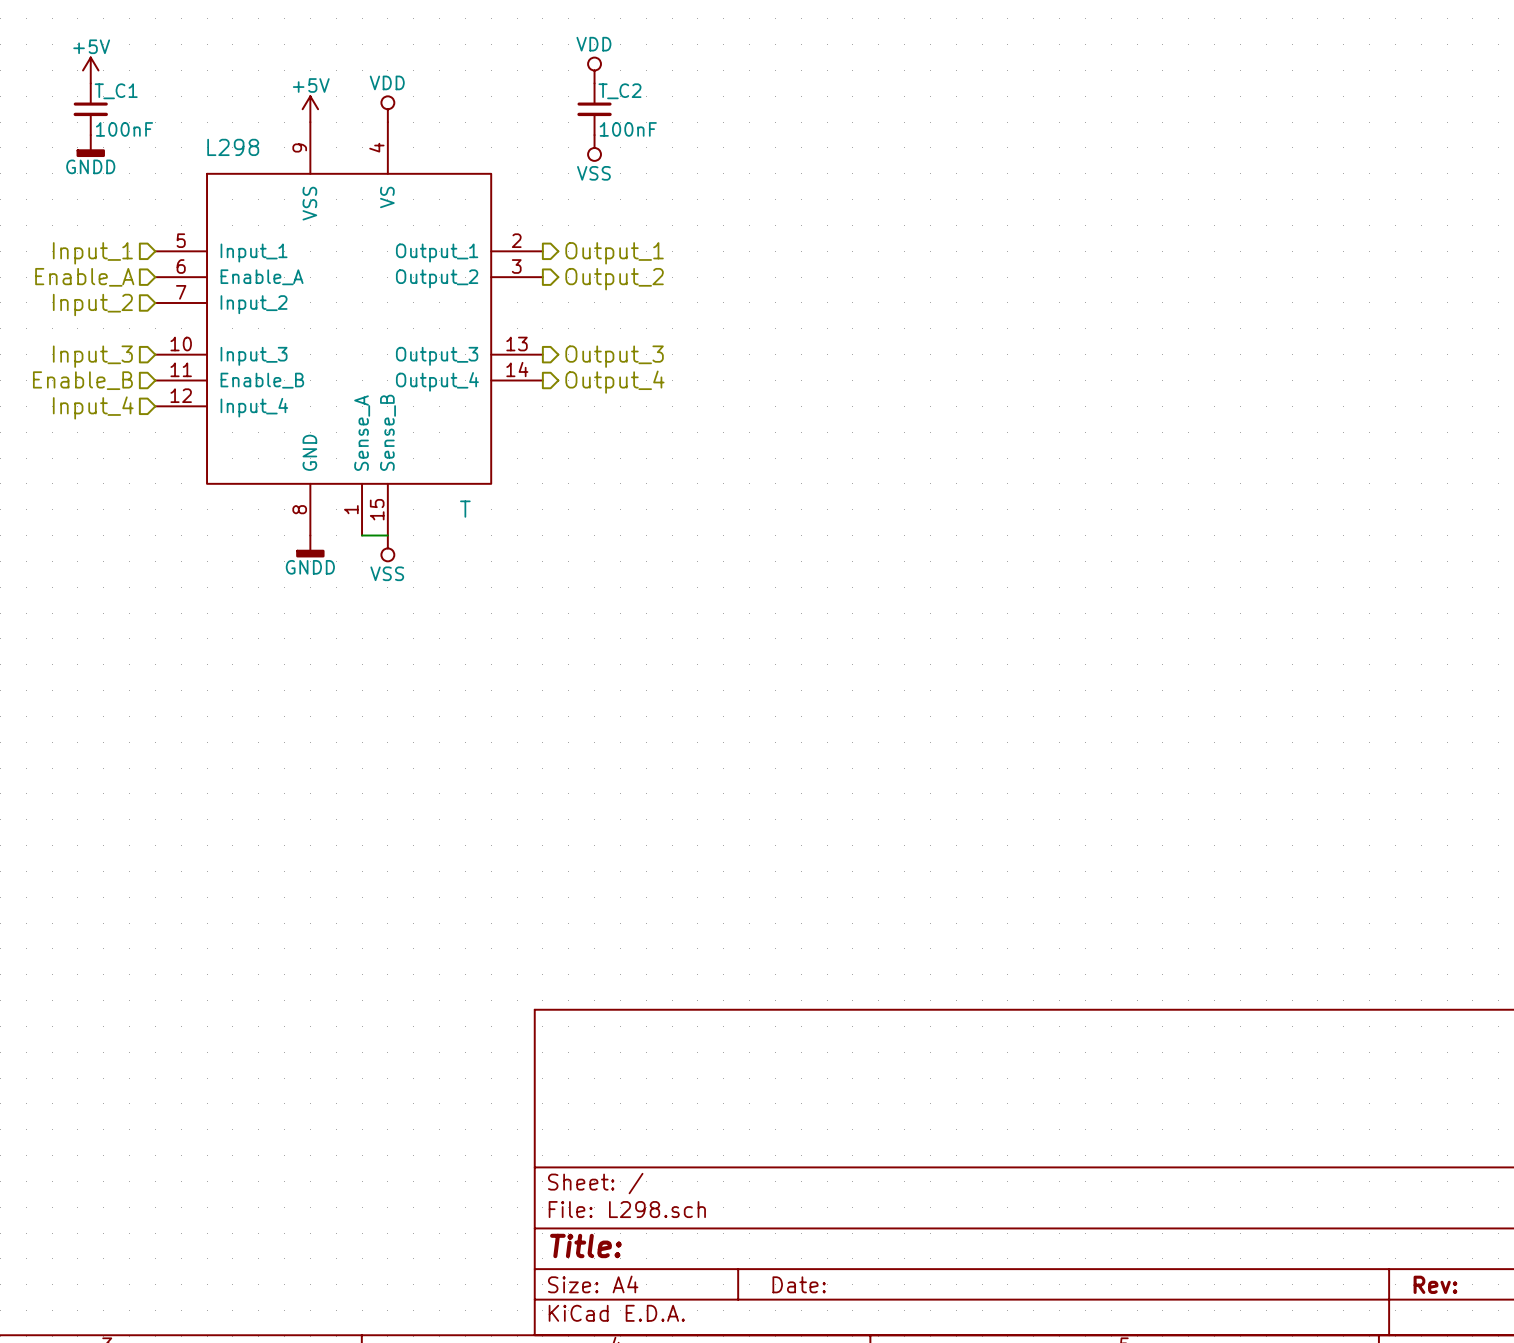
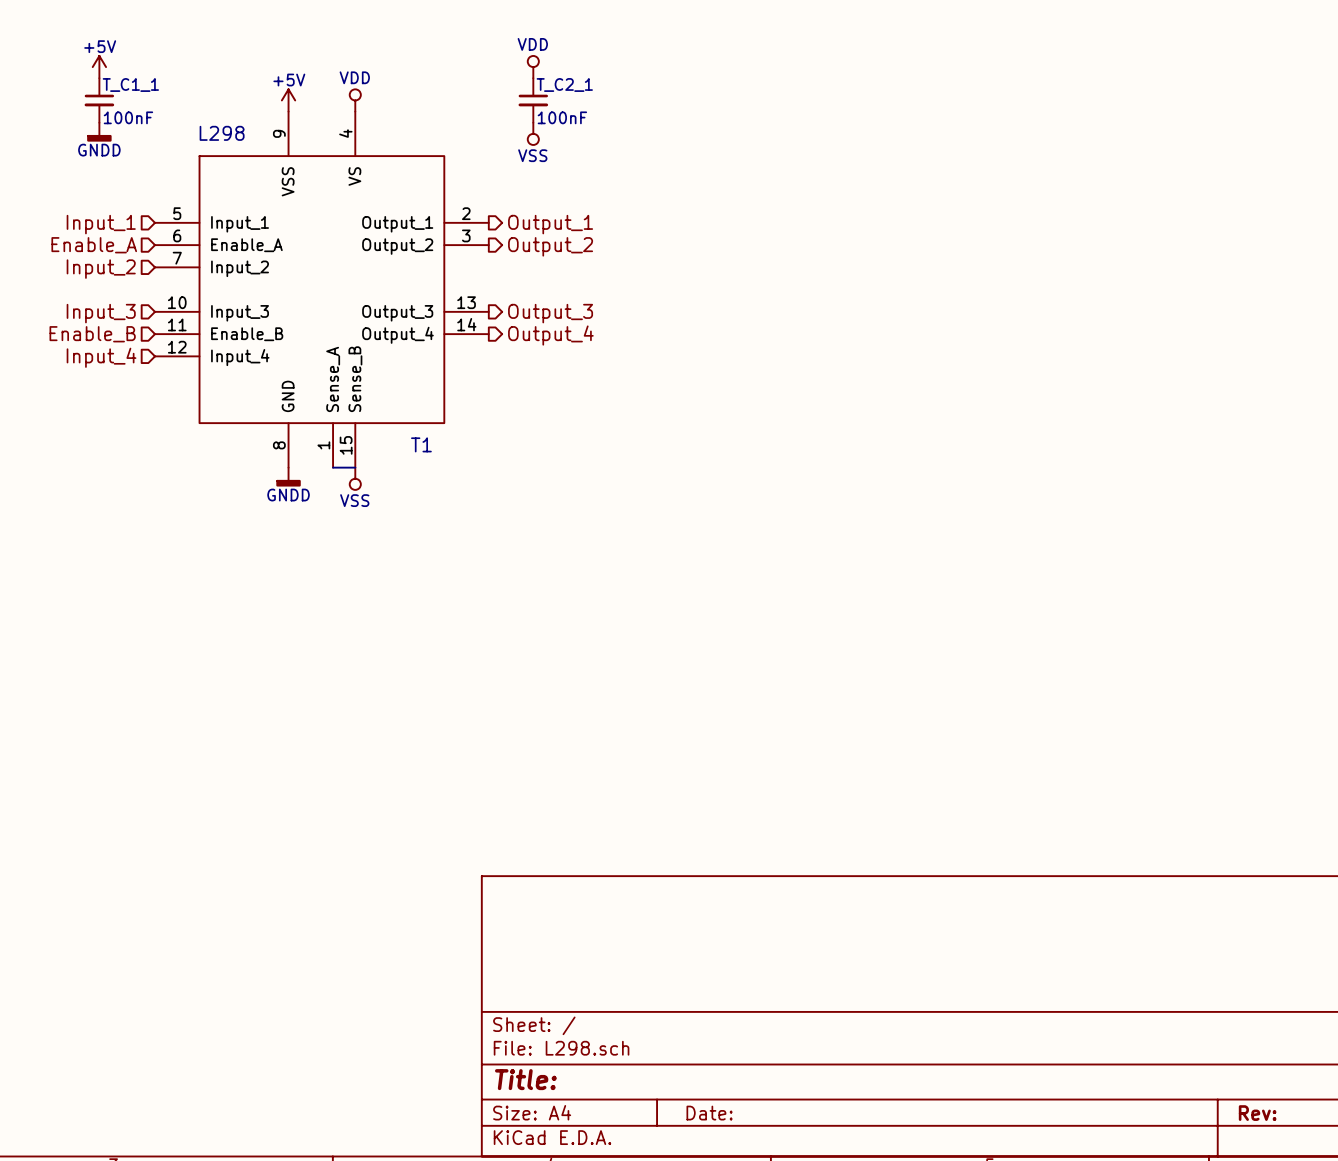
T_C1 name: T_C1 (116, 91) -> T_C1_1 (130, 85)
T_C2 name: T_C2 (619, 91) -> T_C2_1 (564, 85)
T name: T (465, 509) -> T1 (421, 444)

